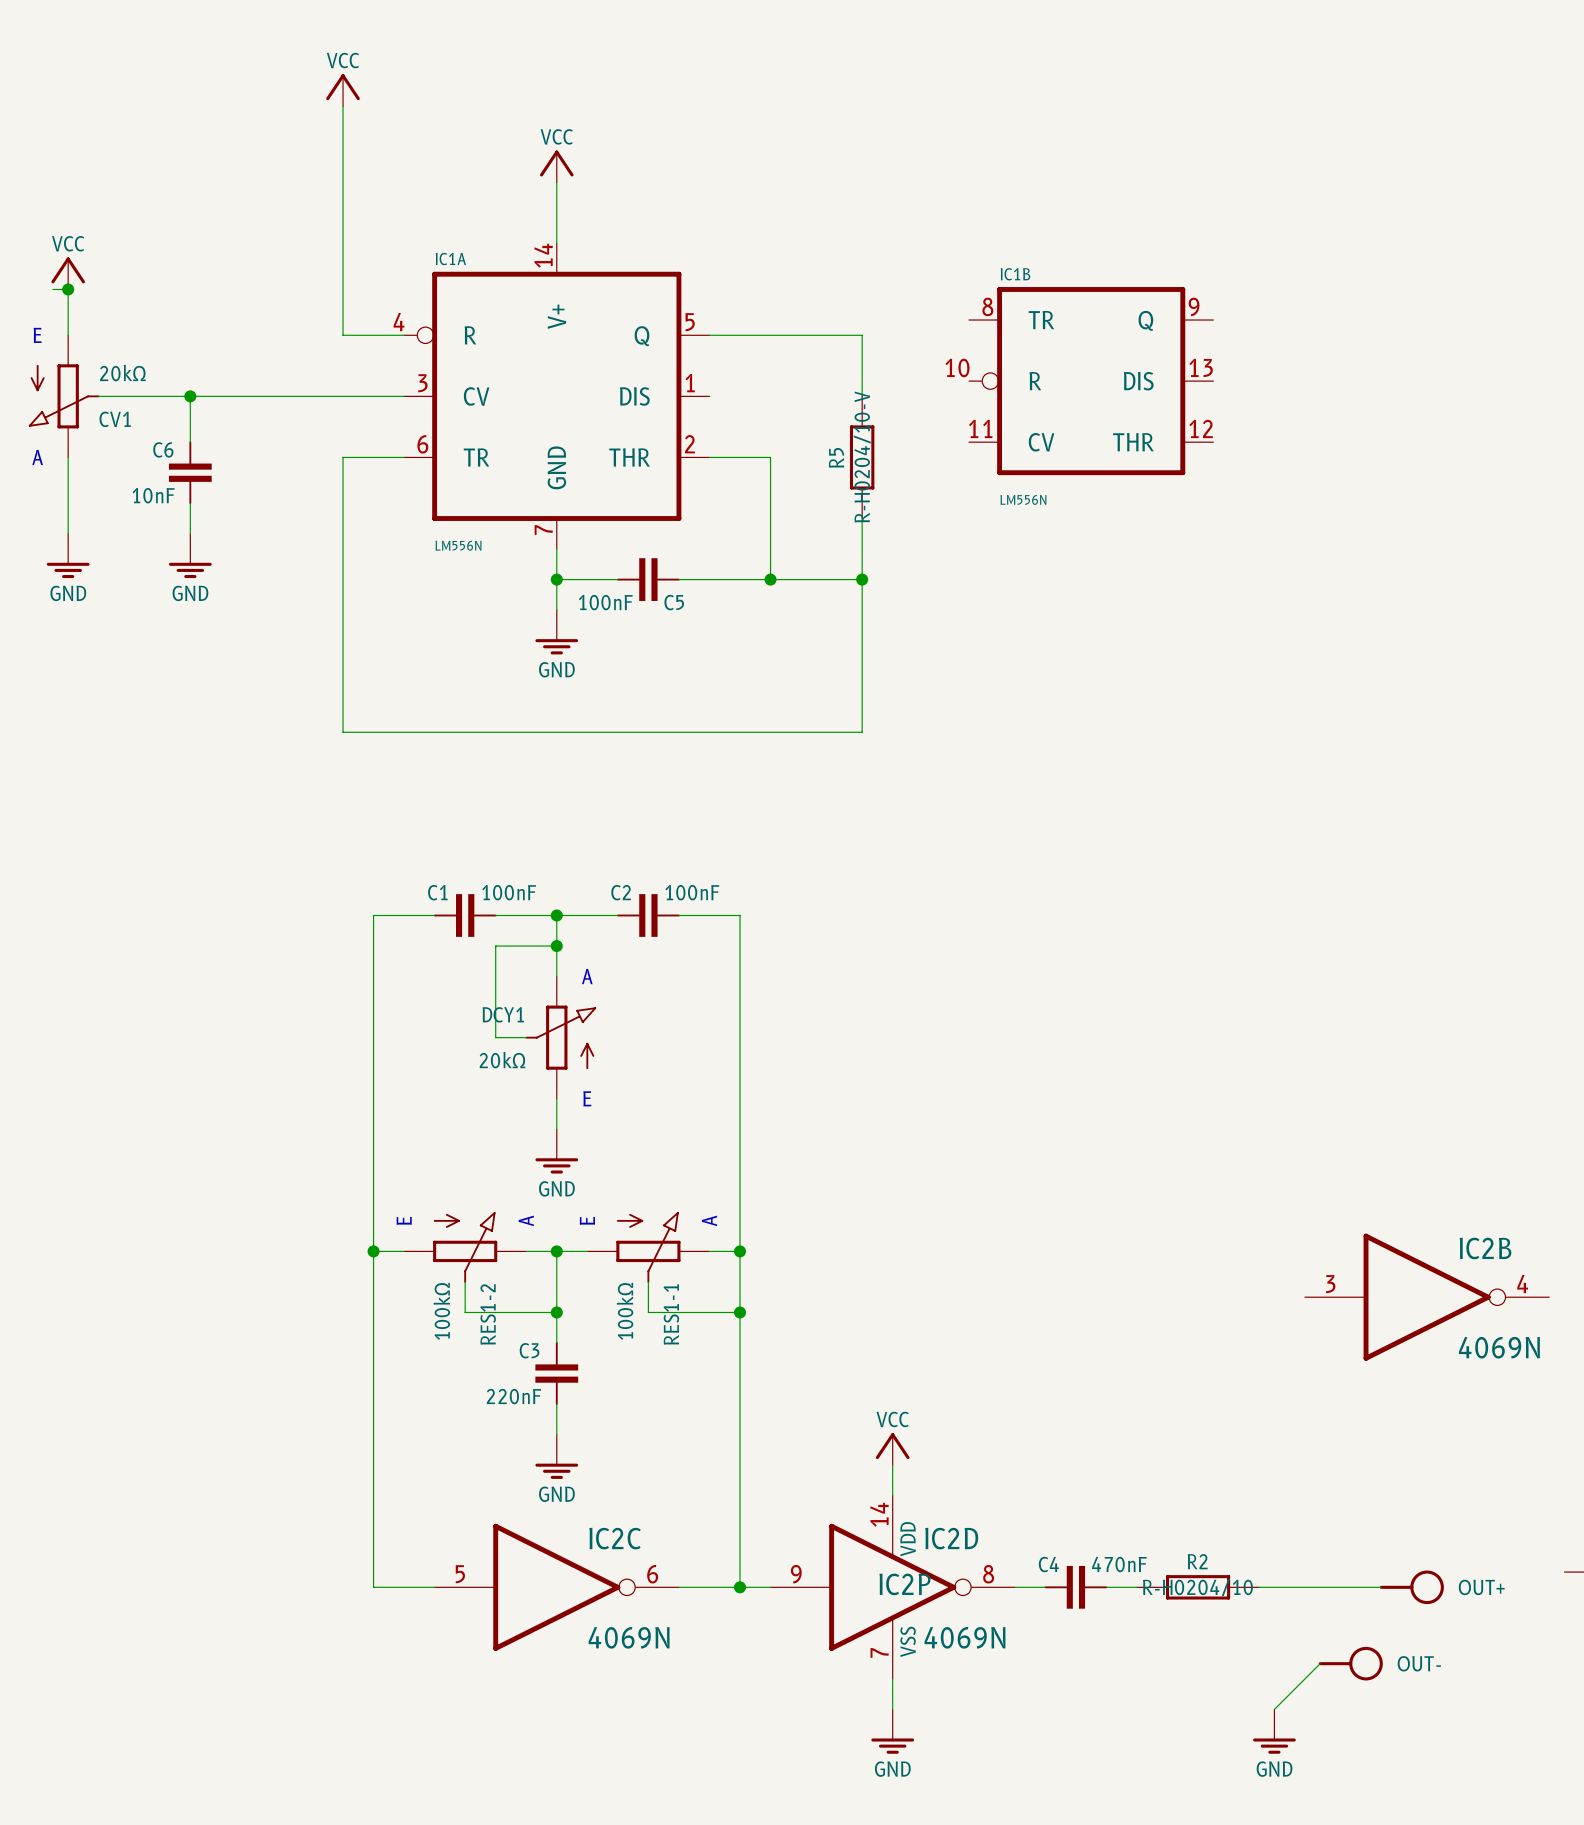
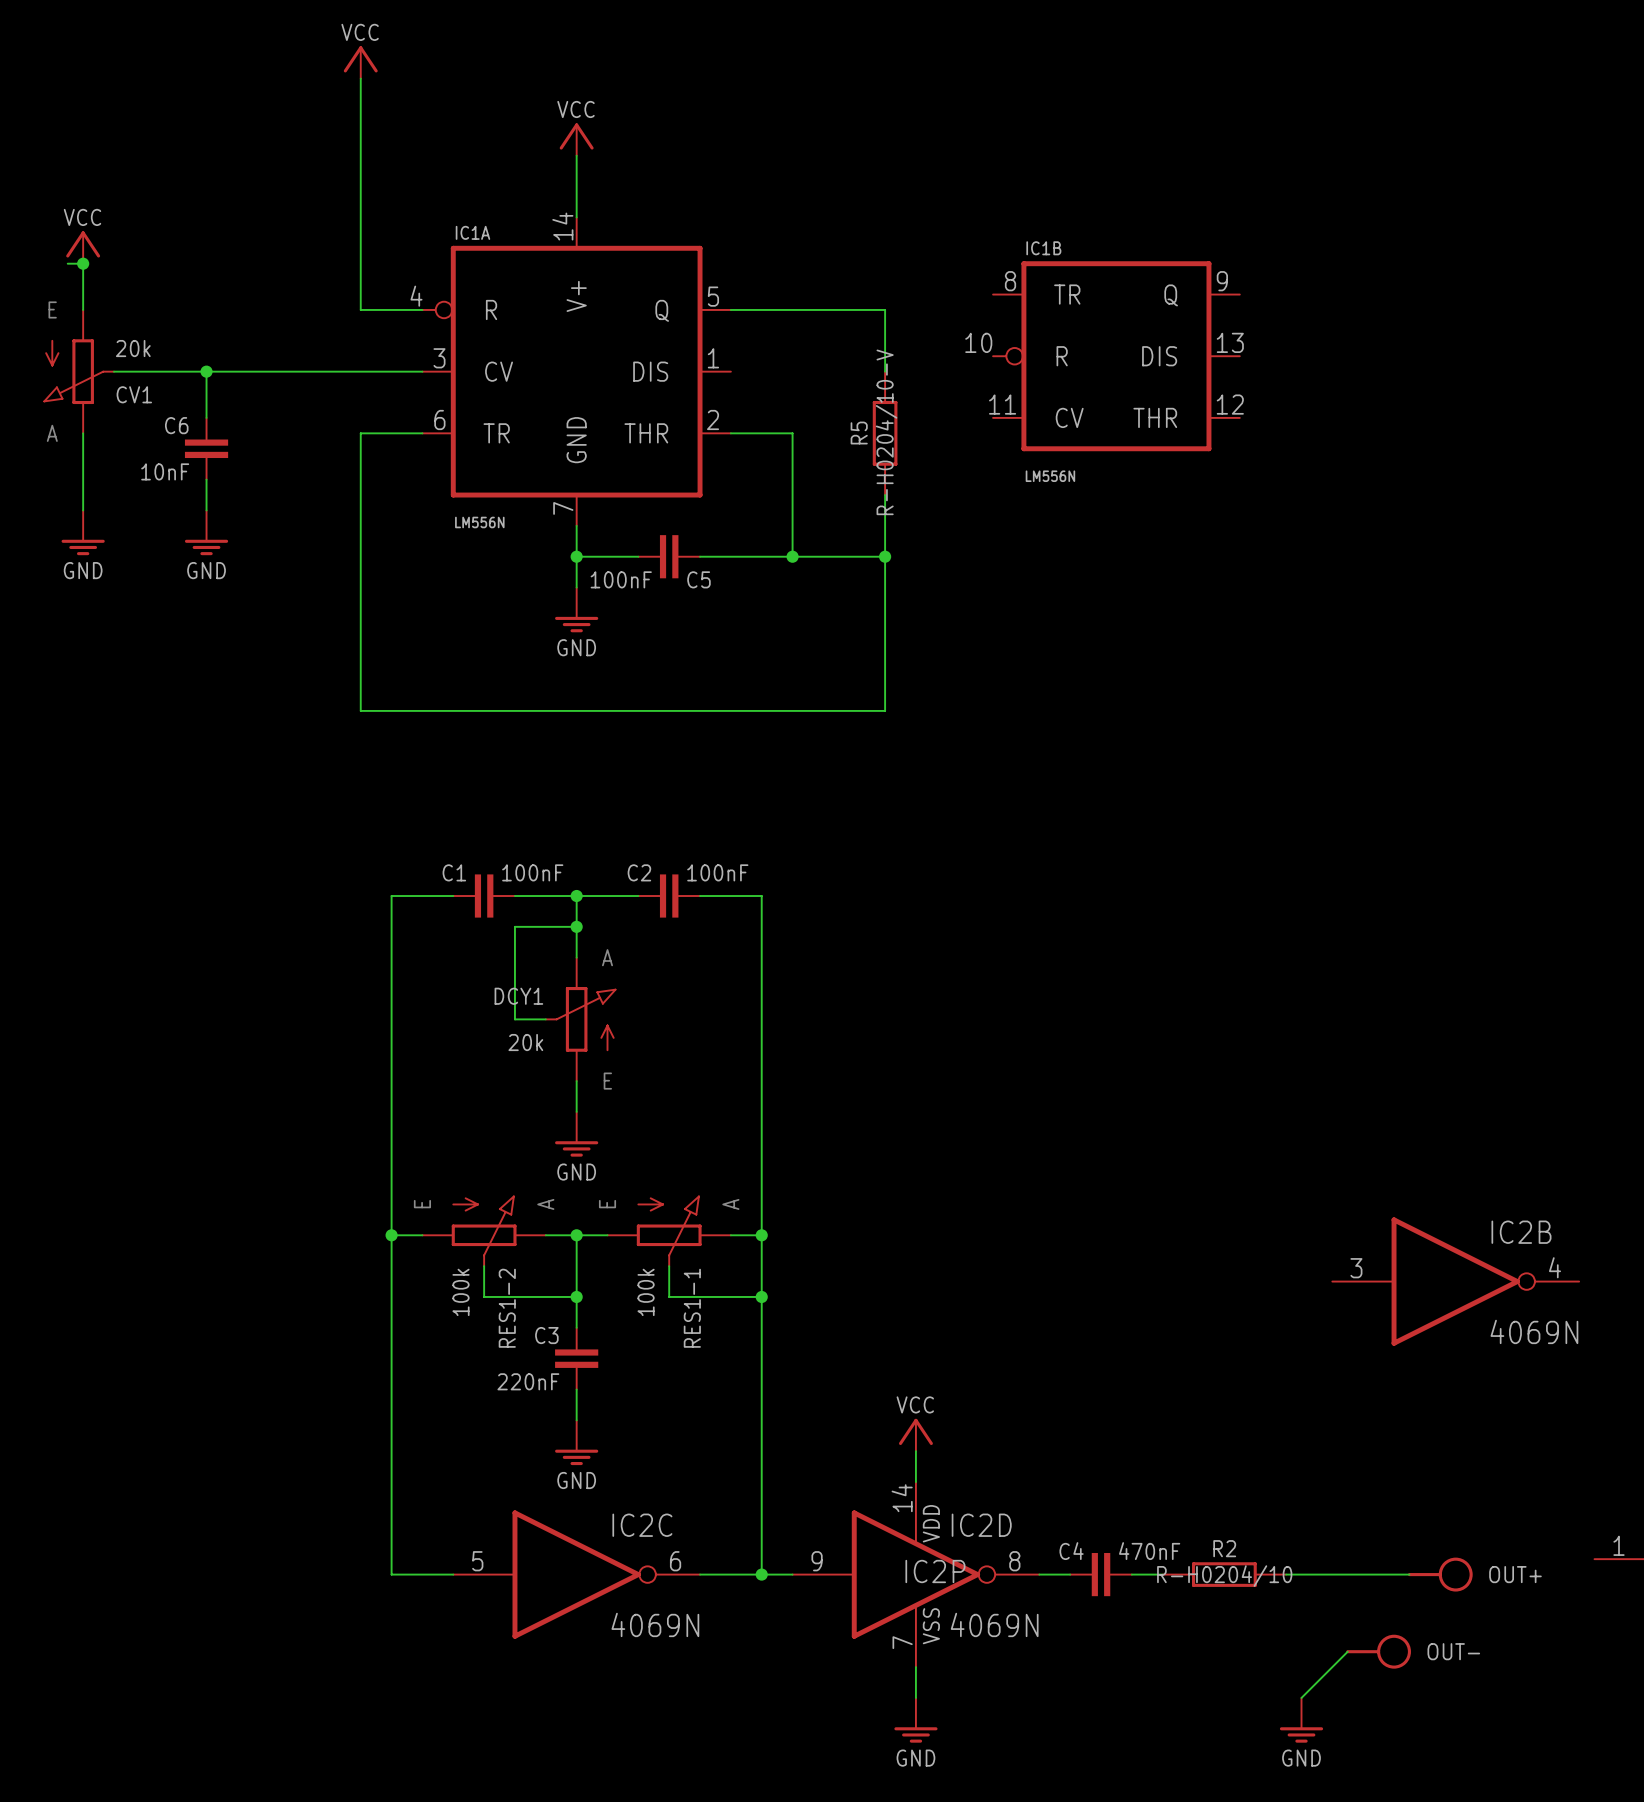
CV1 value: 20kΩ (122, 373) -> 20k (133, 348)
DCY1 value: 20kΩ (502, 1060) -> 20k (525, 1042)
RES1-2 value: 100kΩ (441, 1311) -> 100k (460, 1292)
RES1-1 value: 100kΩ (625, 1311) -> 100k (646, 1292)

